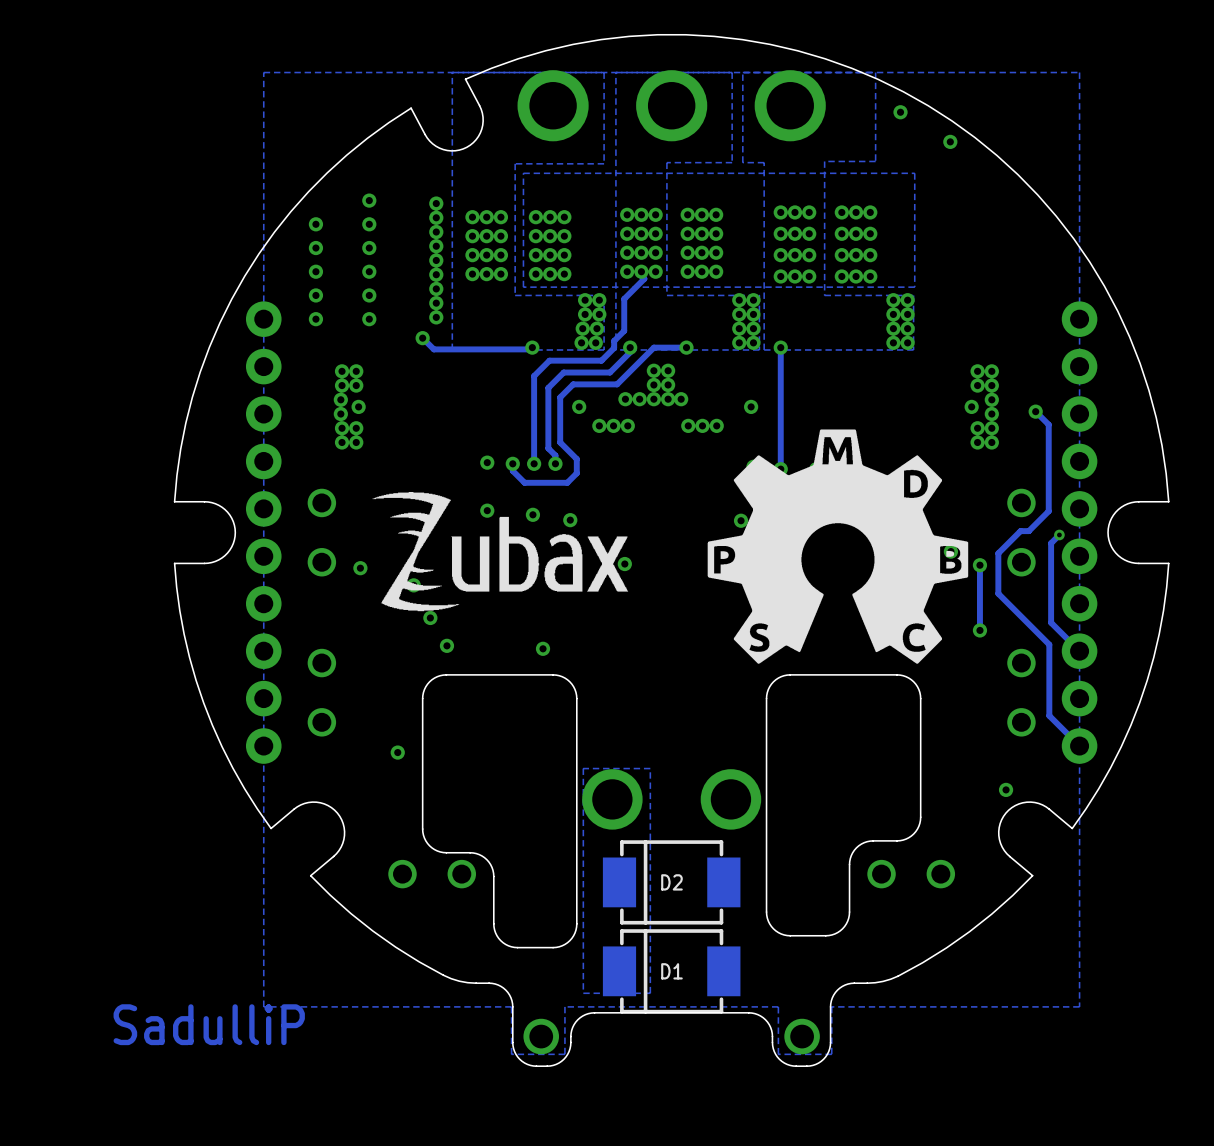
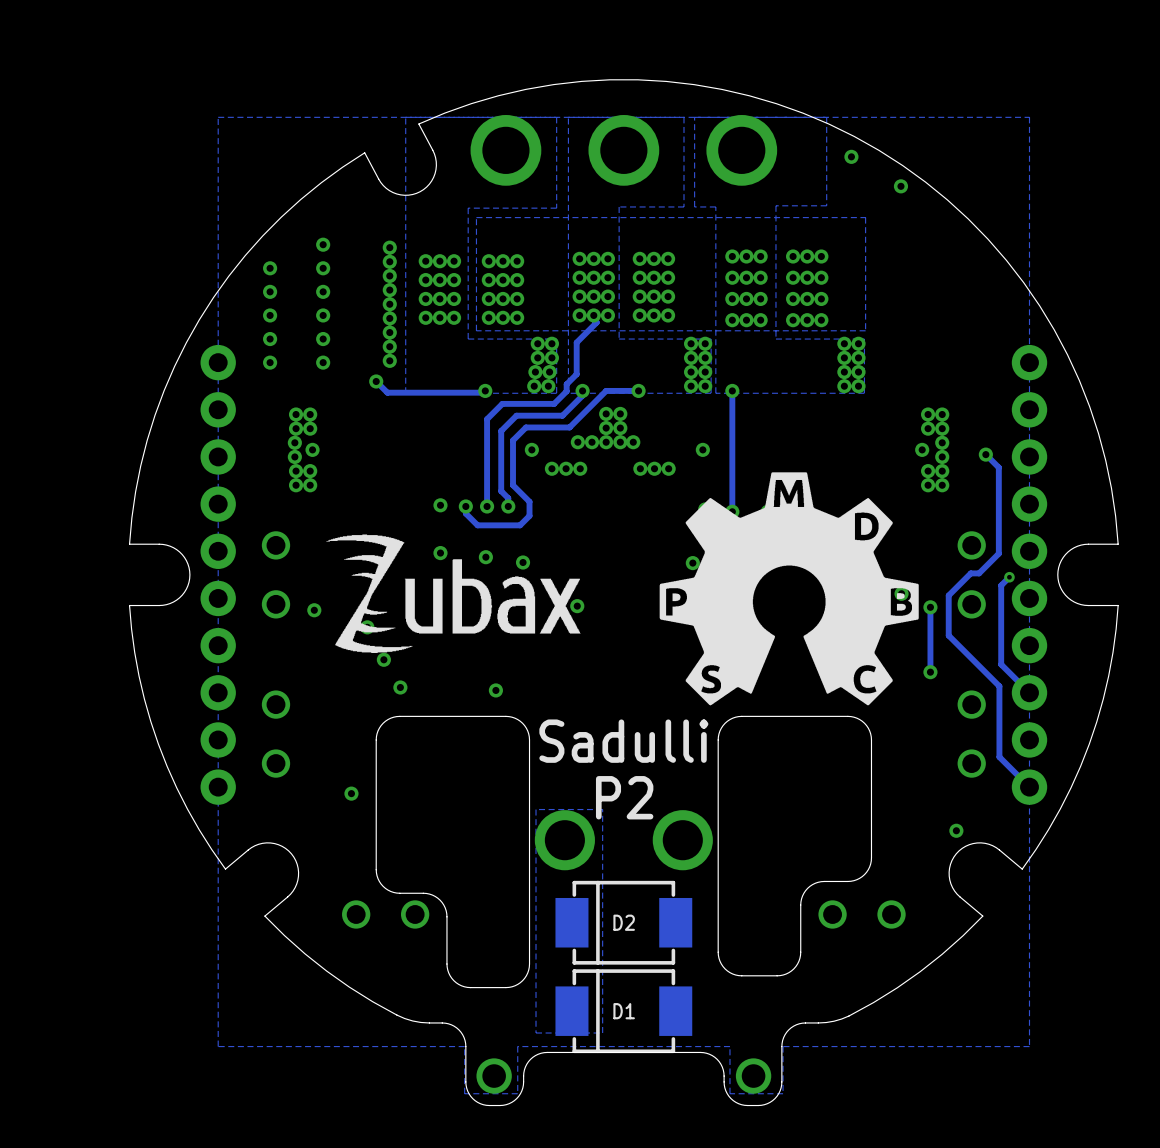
text: none -> Sadulli (623, 741)
text: none -> P2 (624, 797)
text: SadulliP (209, 1024) -> none

